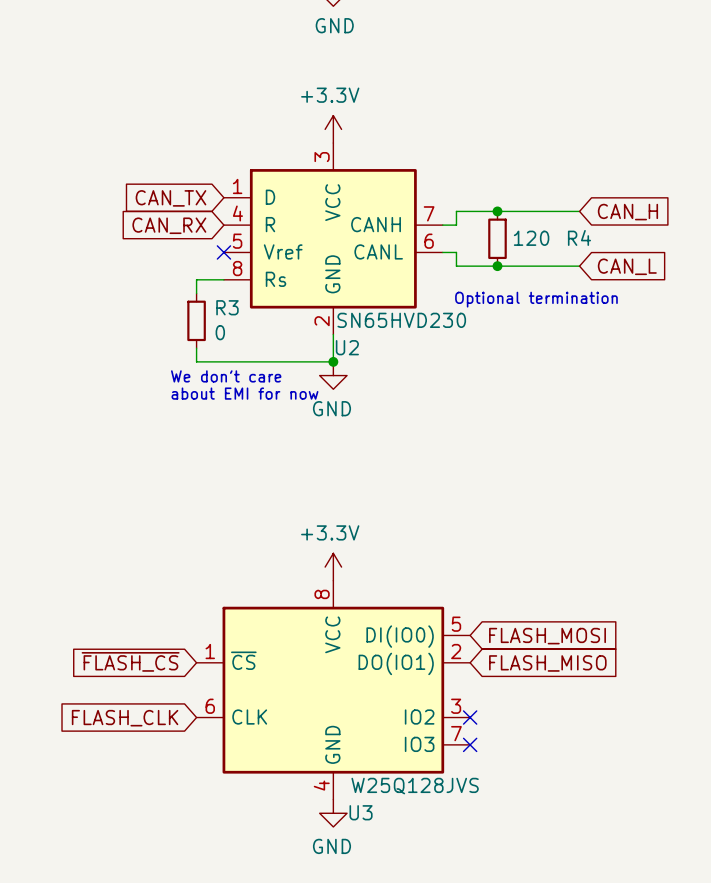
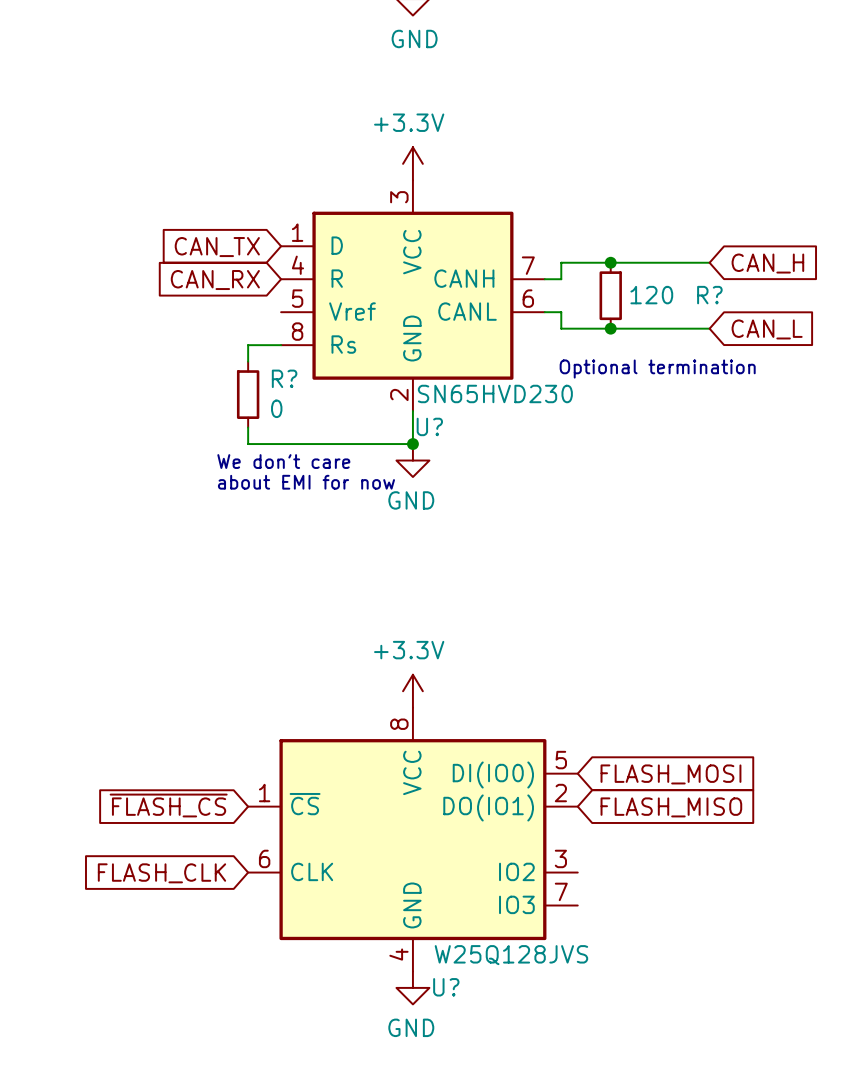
R4 name: R4 (579, 237) -> R? (709, 295)
no-connect mark: (223, 252) -> none
R3 name: R3 (227, 307) -> R? (284, 378)
U2 name: U2 (347, 347) -> U? (429, 426)
no-connect mark: (470, 717) -> none
no-connect mark: (470, 744) -> none
U3 name: U3 (361, 812) -> U? (446, 987)

